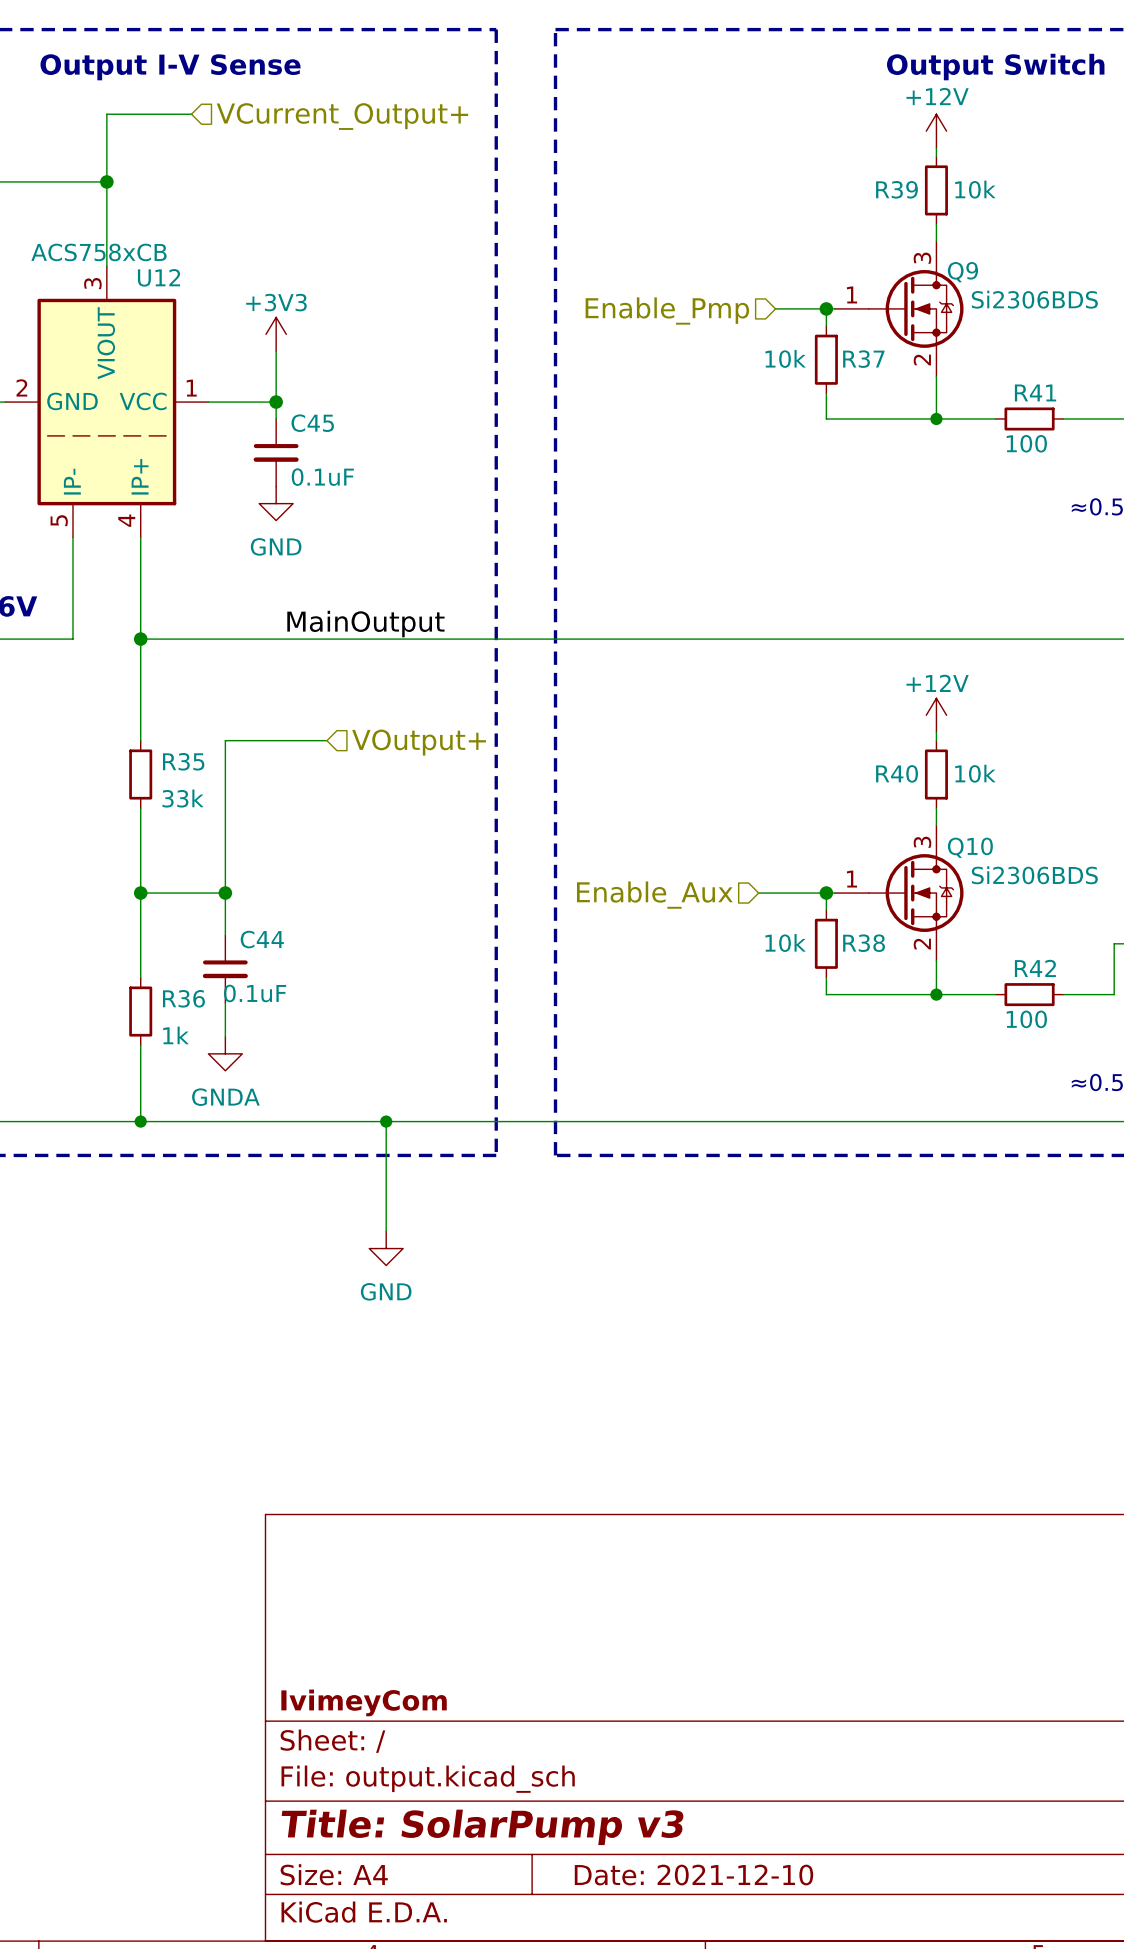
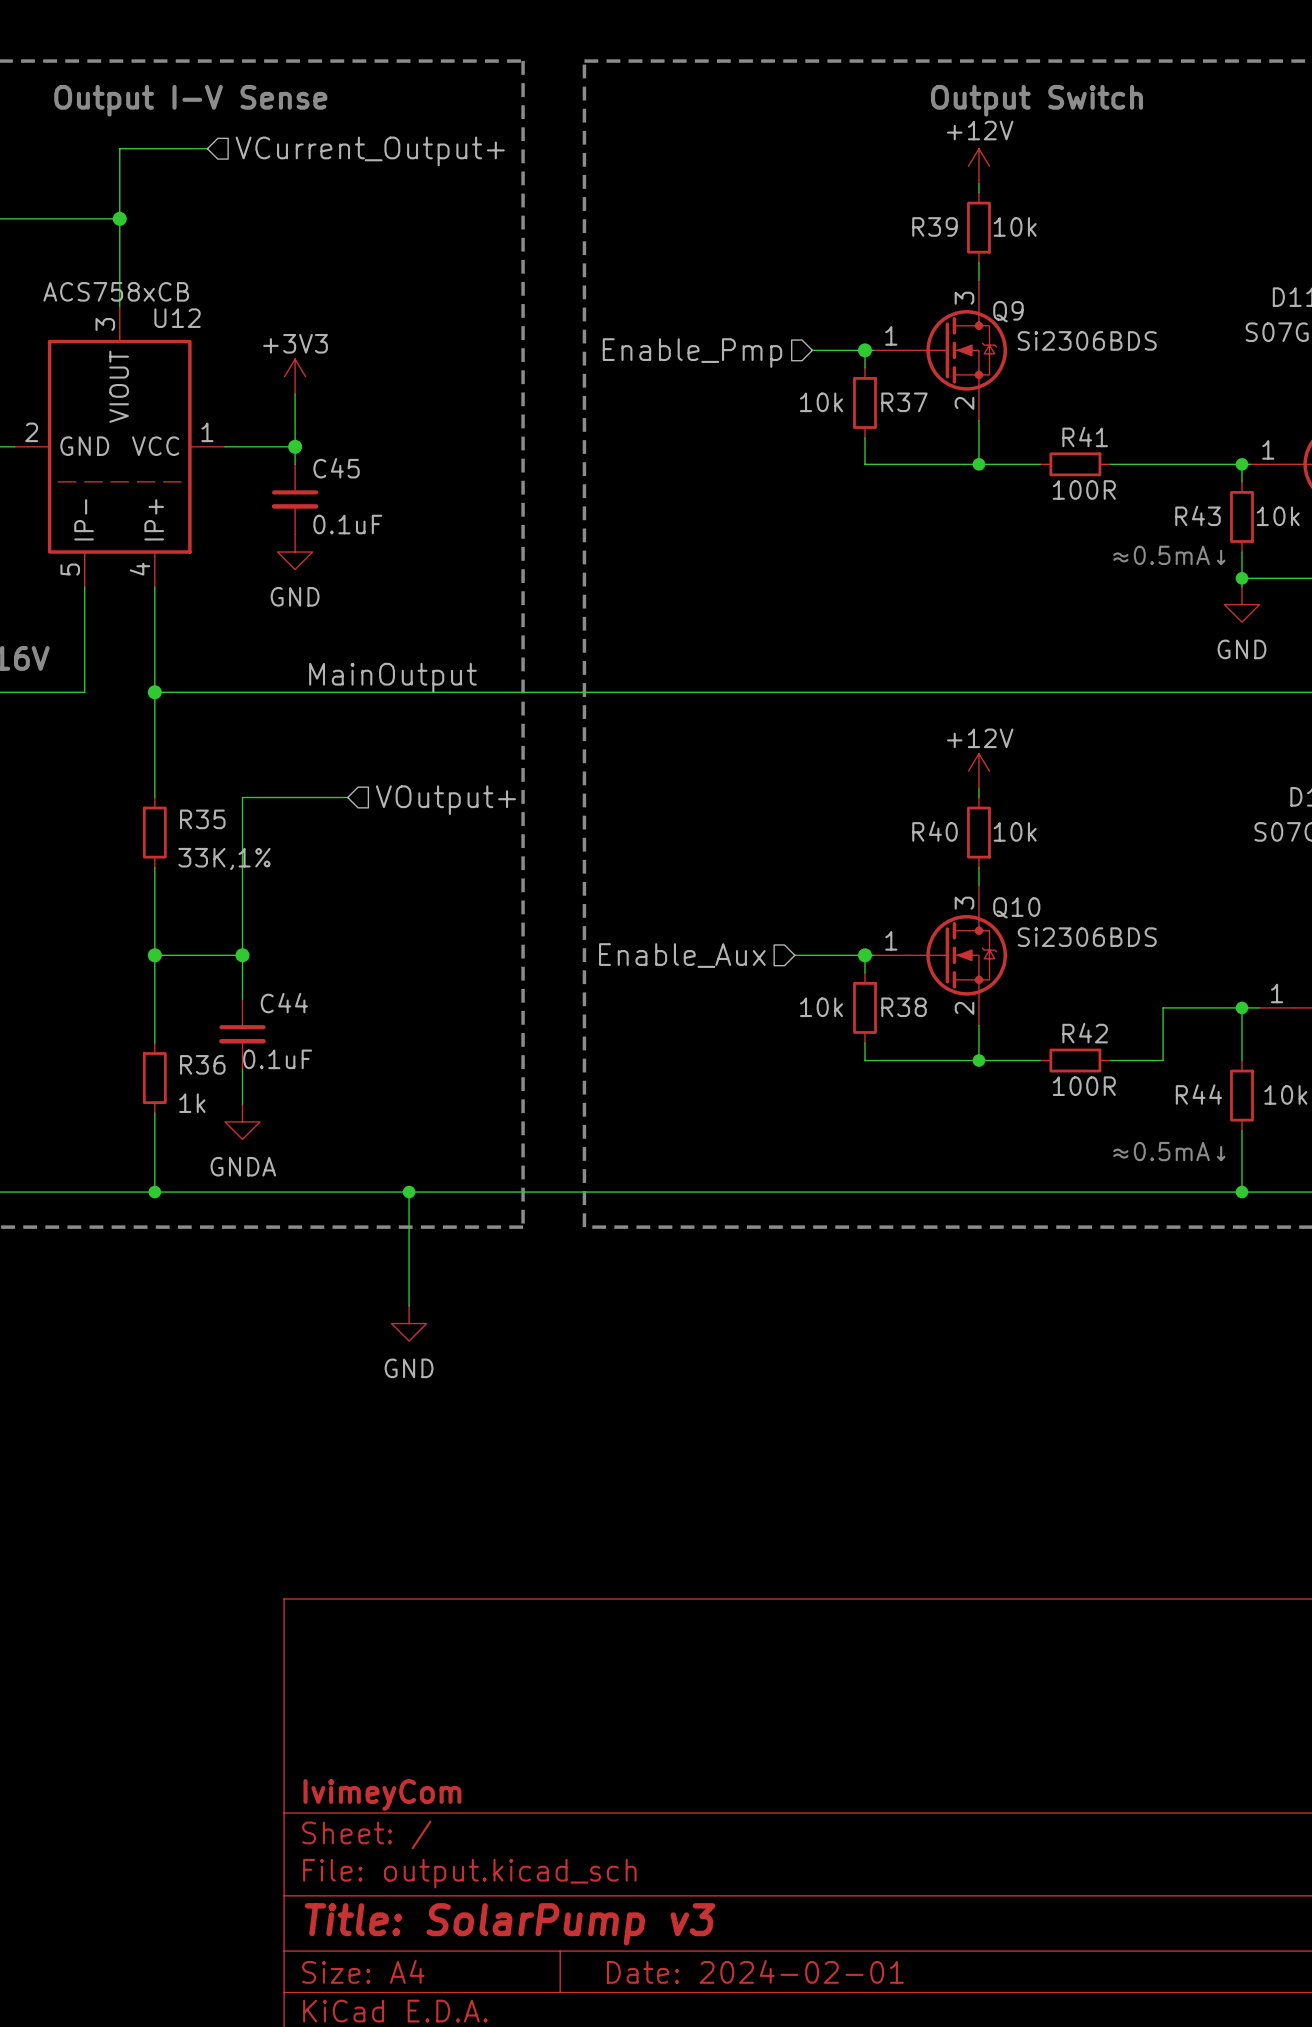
R41 value: 100 (1026, 443) -> 100R (1084, 489)
R35 value: 33k (183, 798) -> 33K,1% (224, 858)
R42 value: 100 (1026, 1019) -> 100R (1084, 1086)
title block: Date: 2021-12-10 (693, 1875) -> Date: 2024-02-01 (755, 1971)

